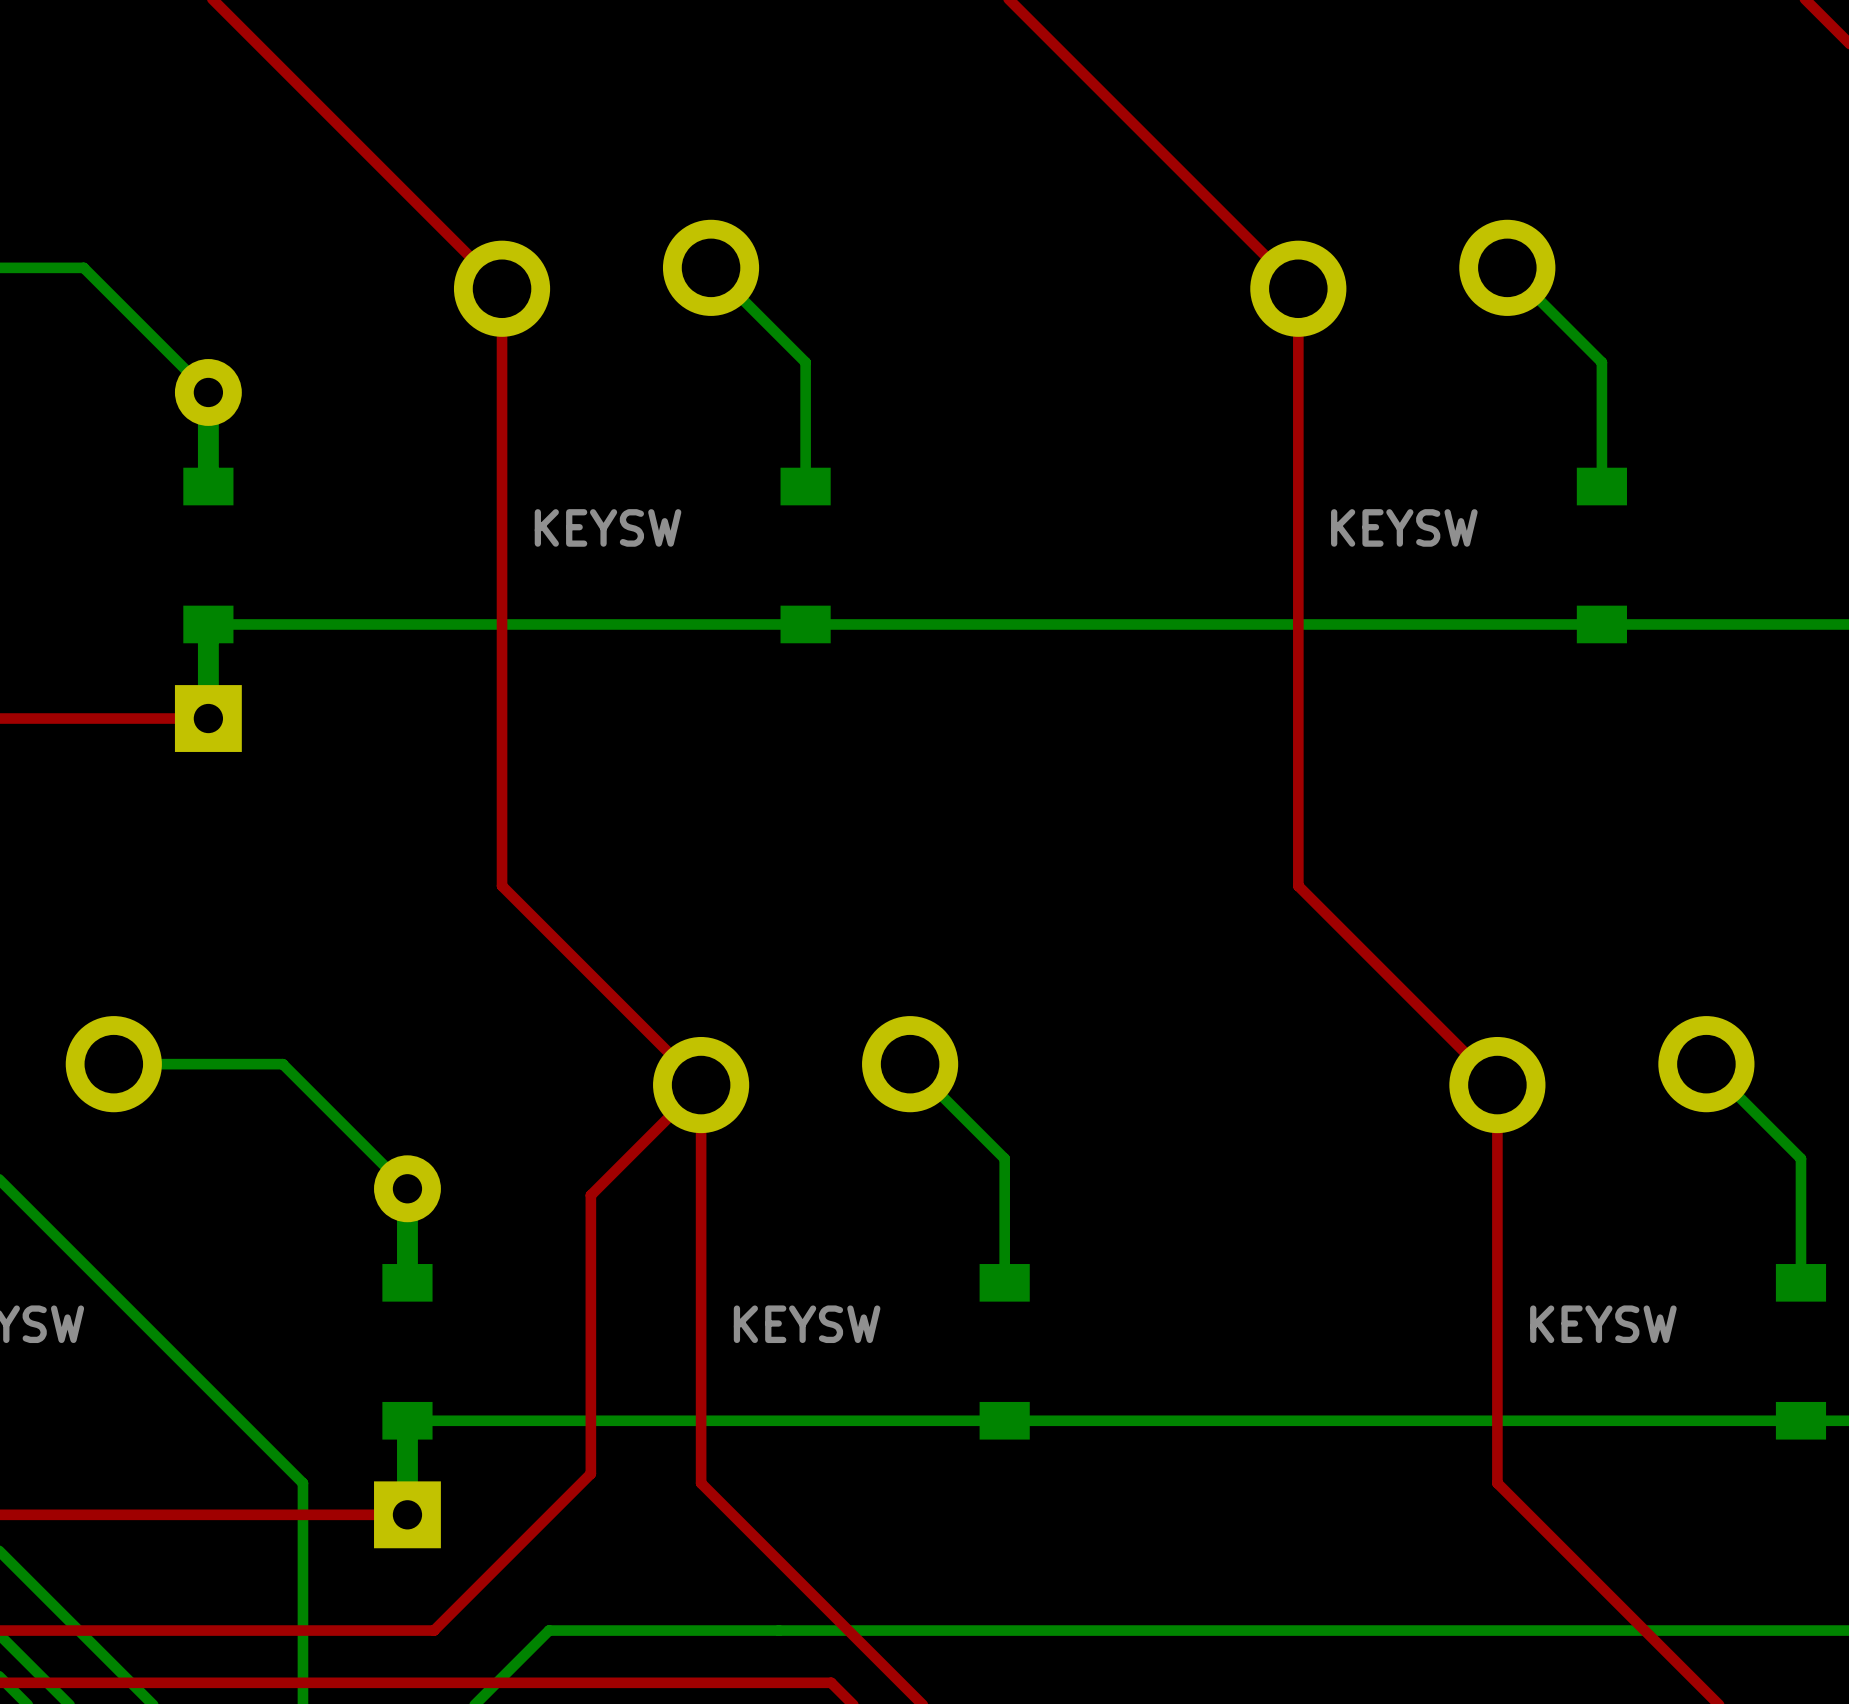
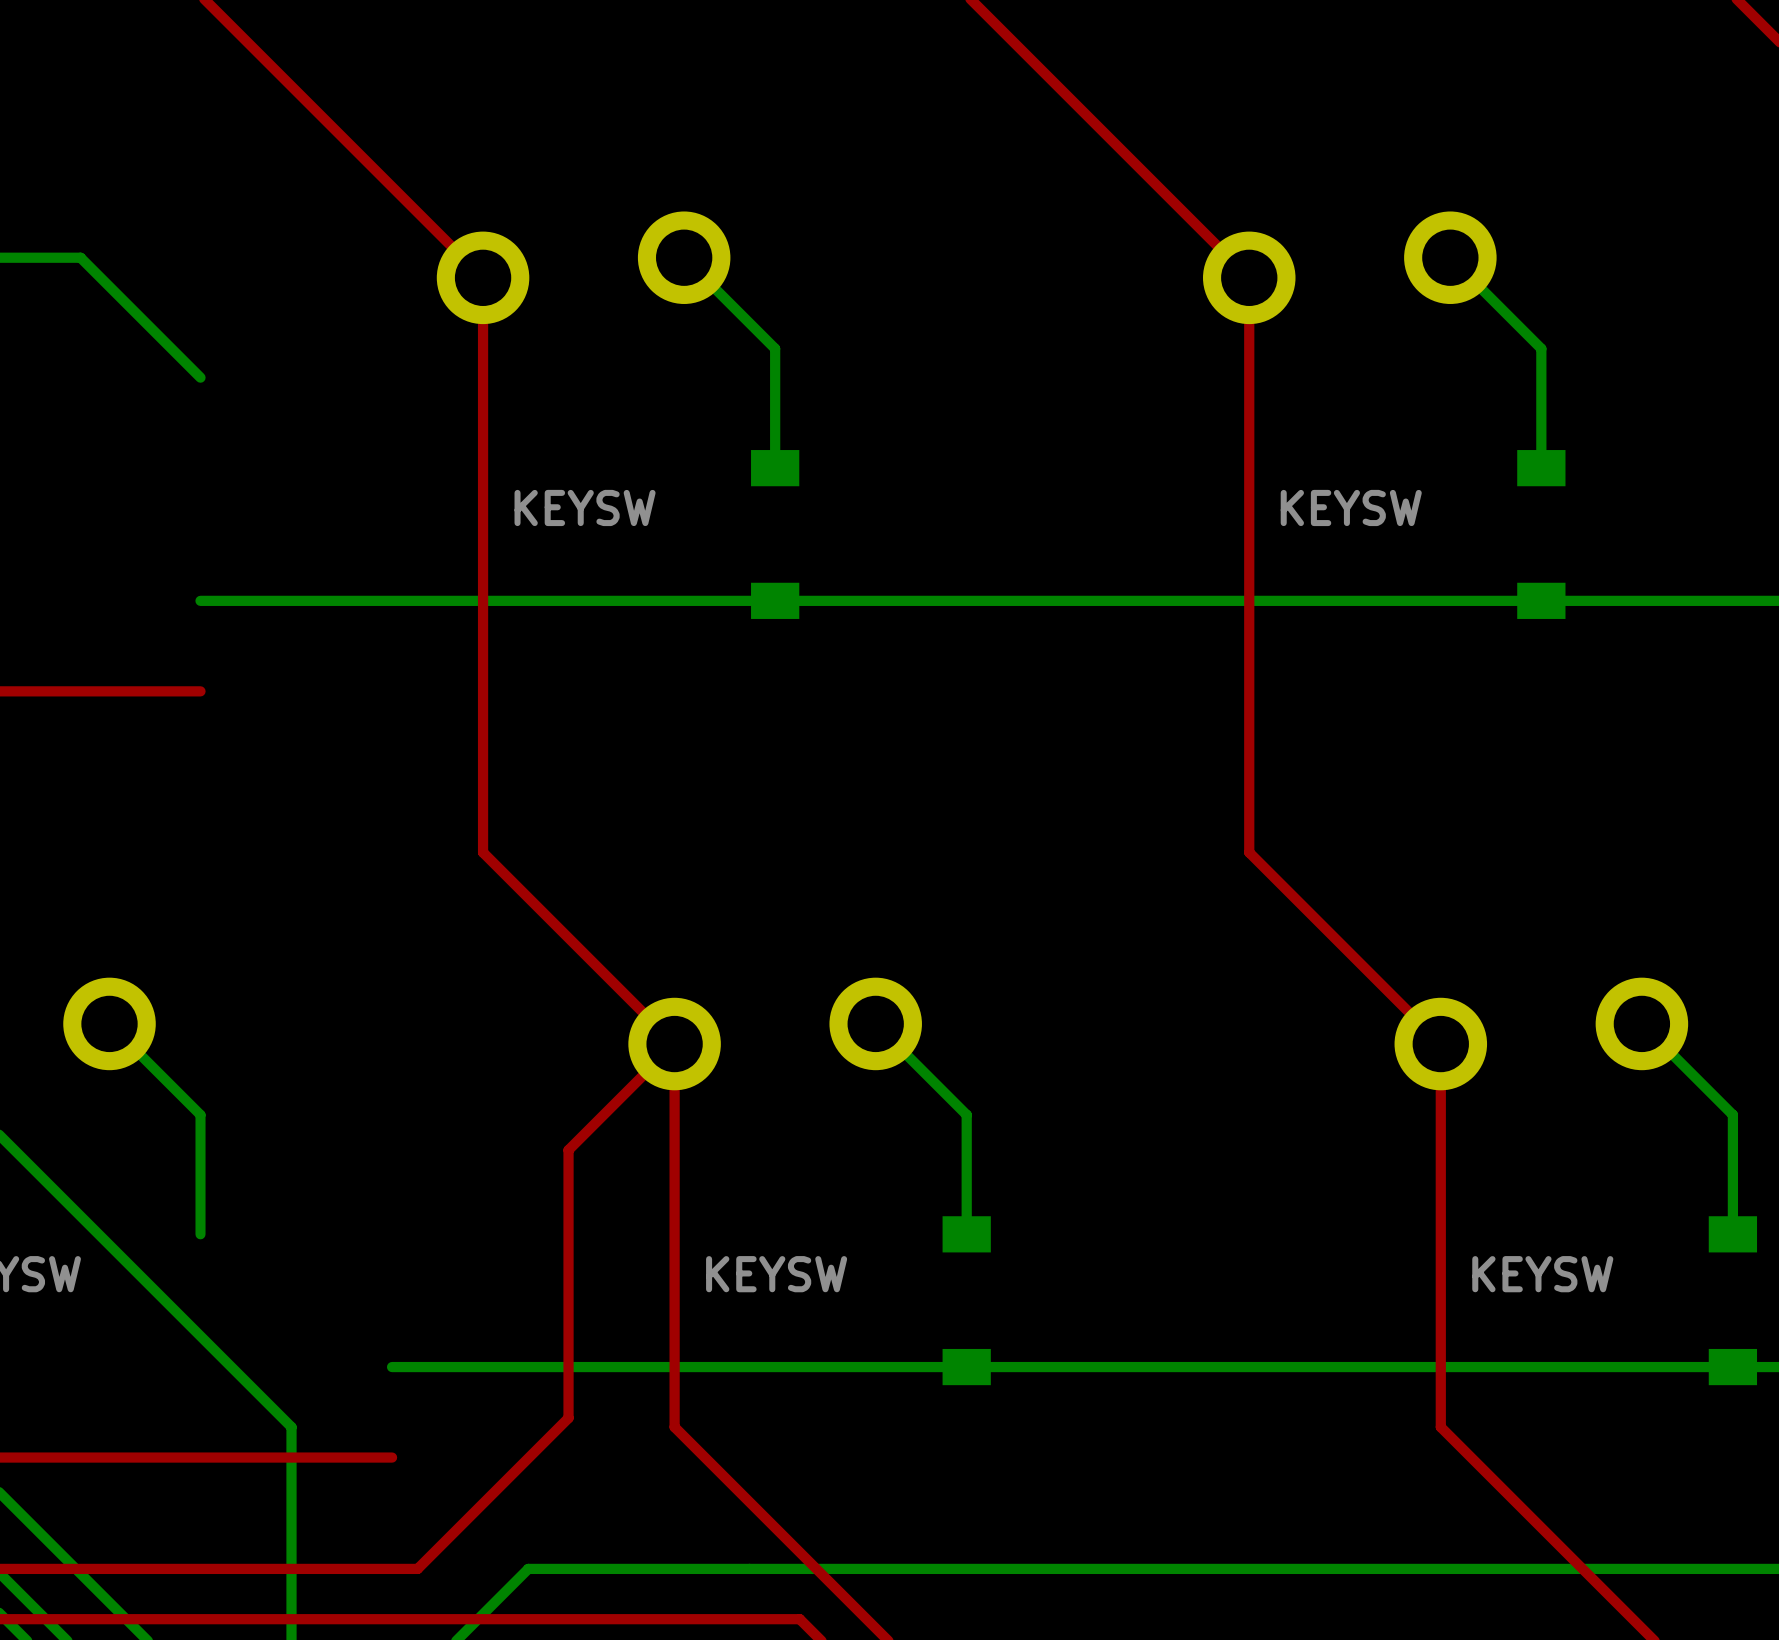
part: (208, 555) -> none
bottom track: (113, 1064) (282, 1064) (407, 1188) -> (109, 1023) (200, 1114) (200, 1234)
part: (407, 1351) -> none

